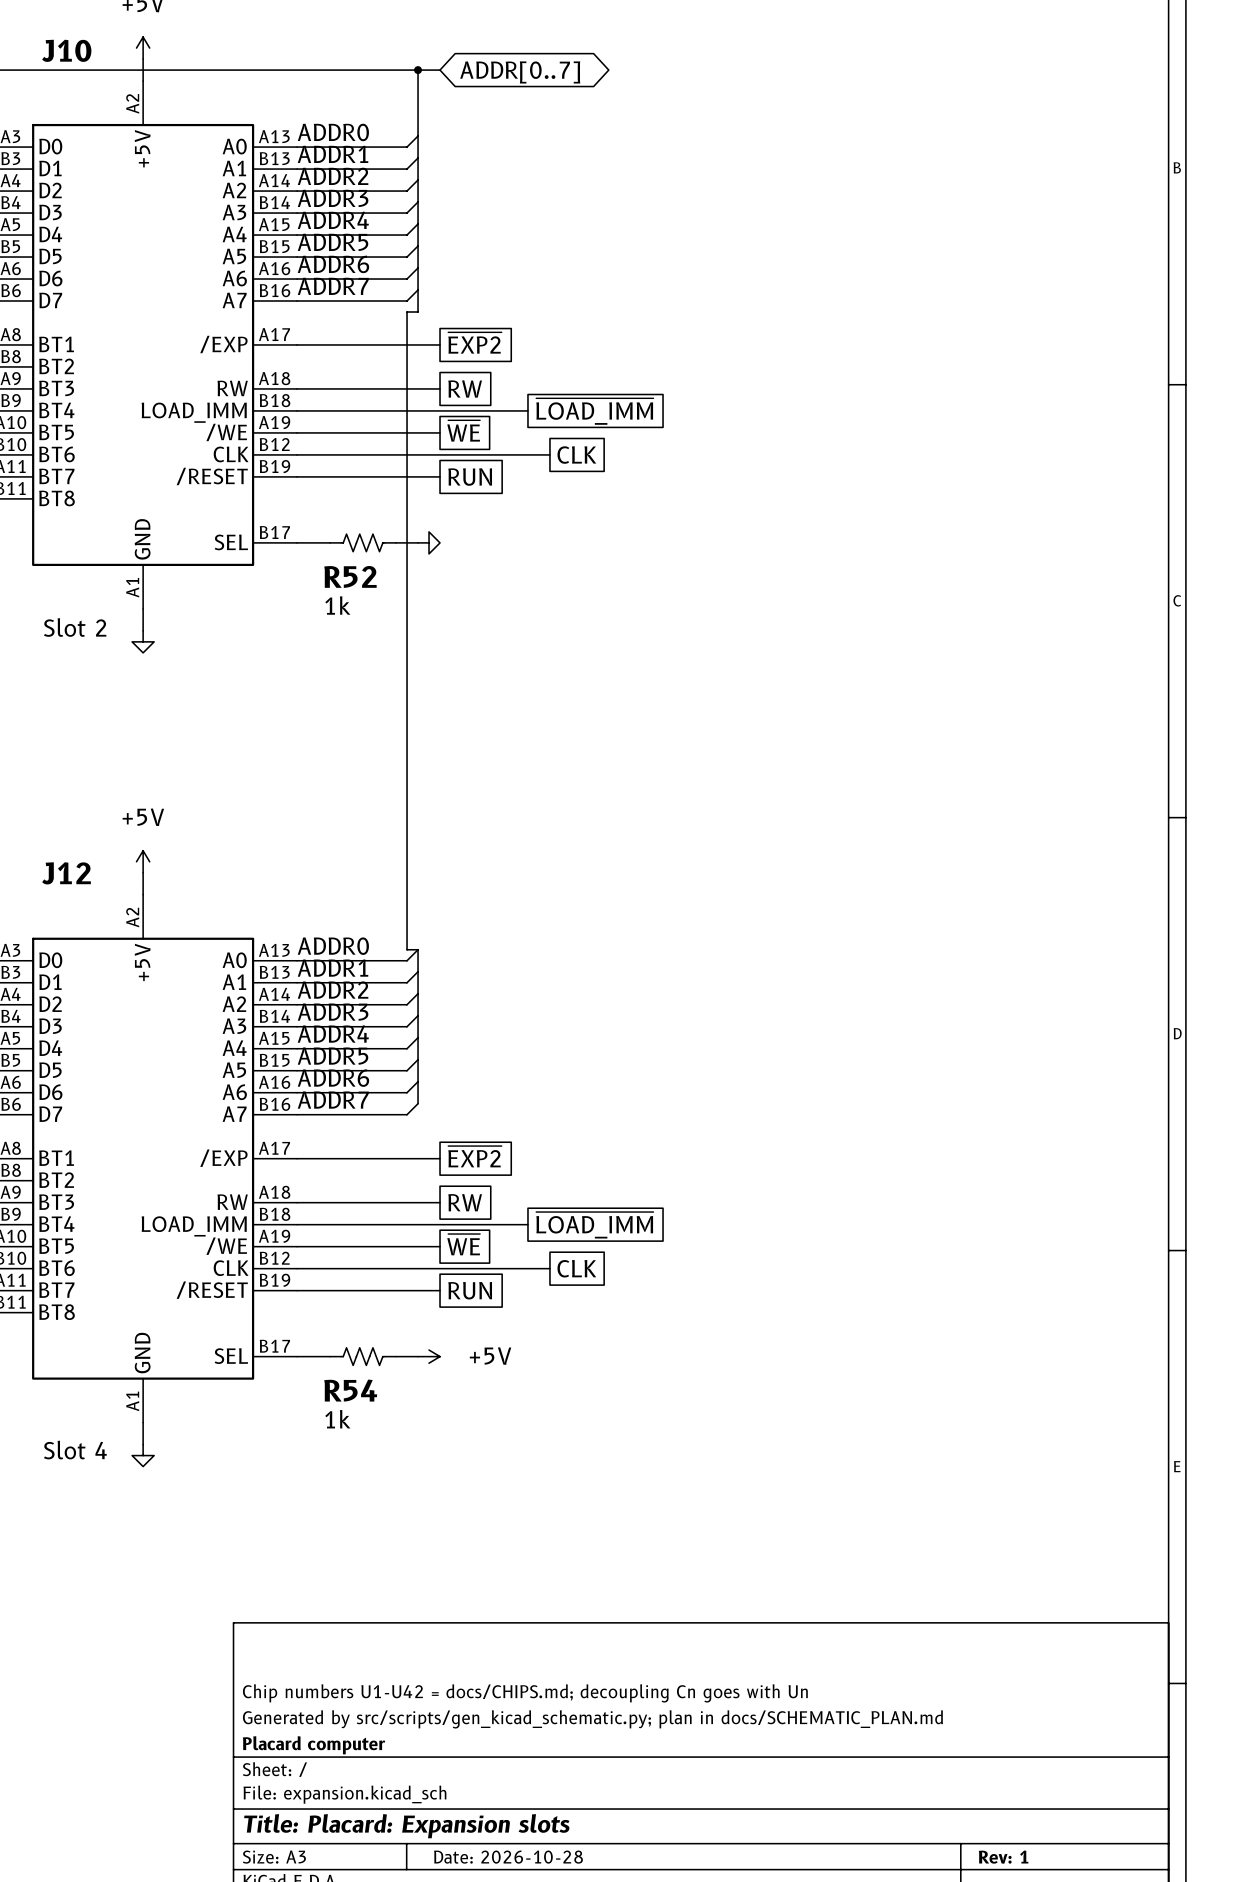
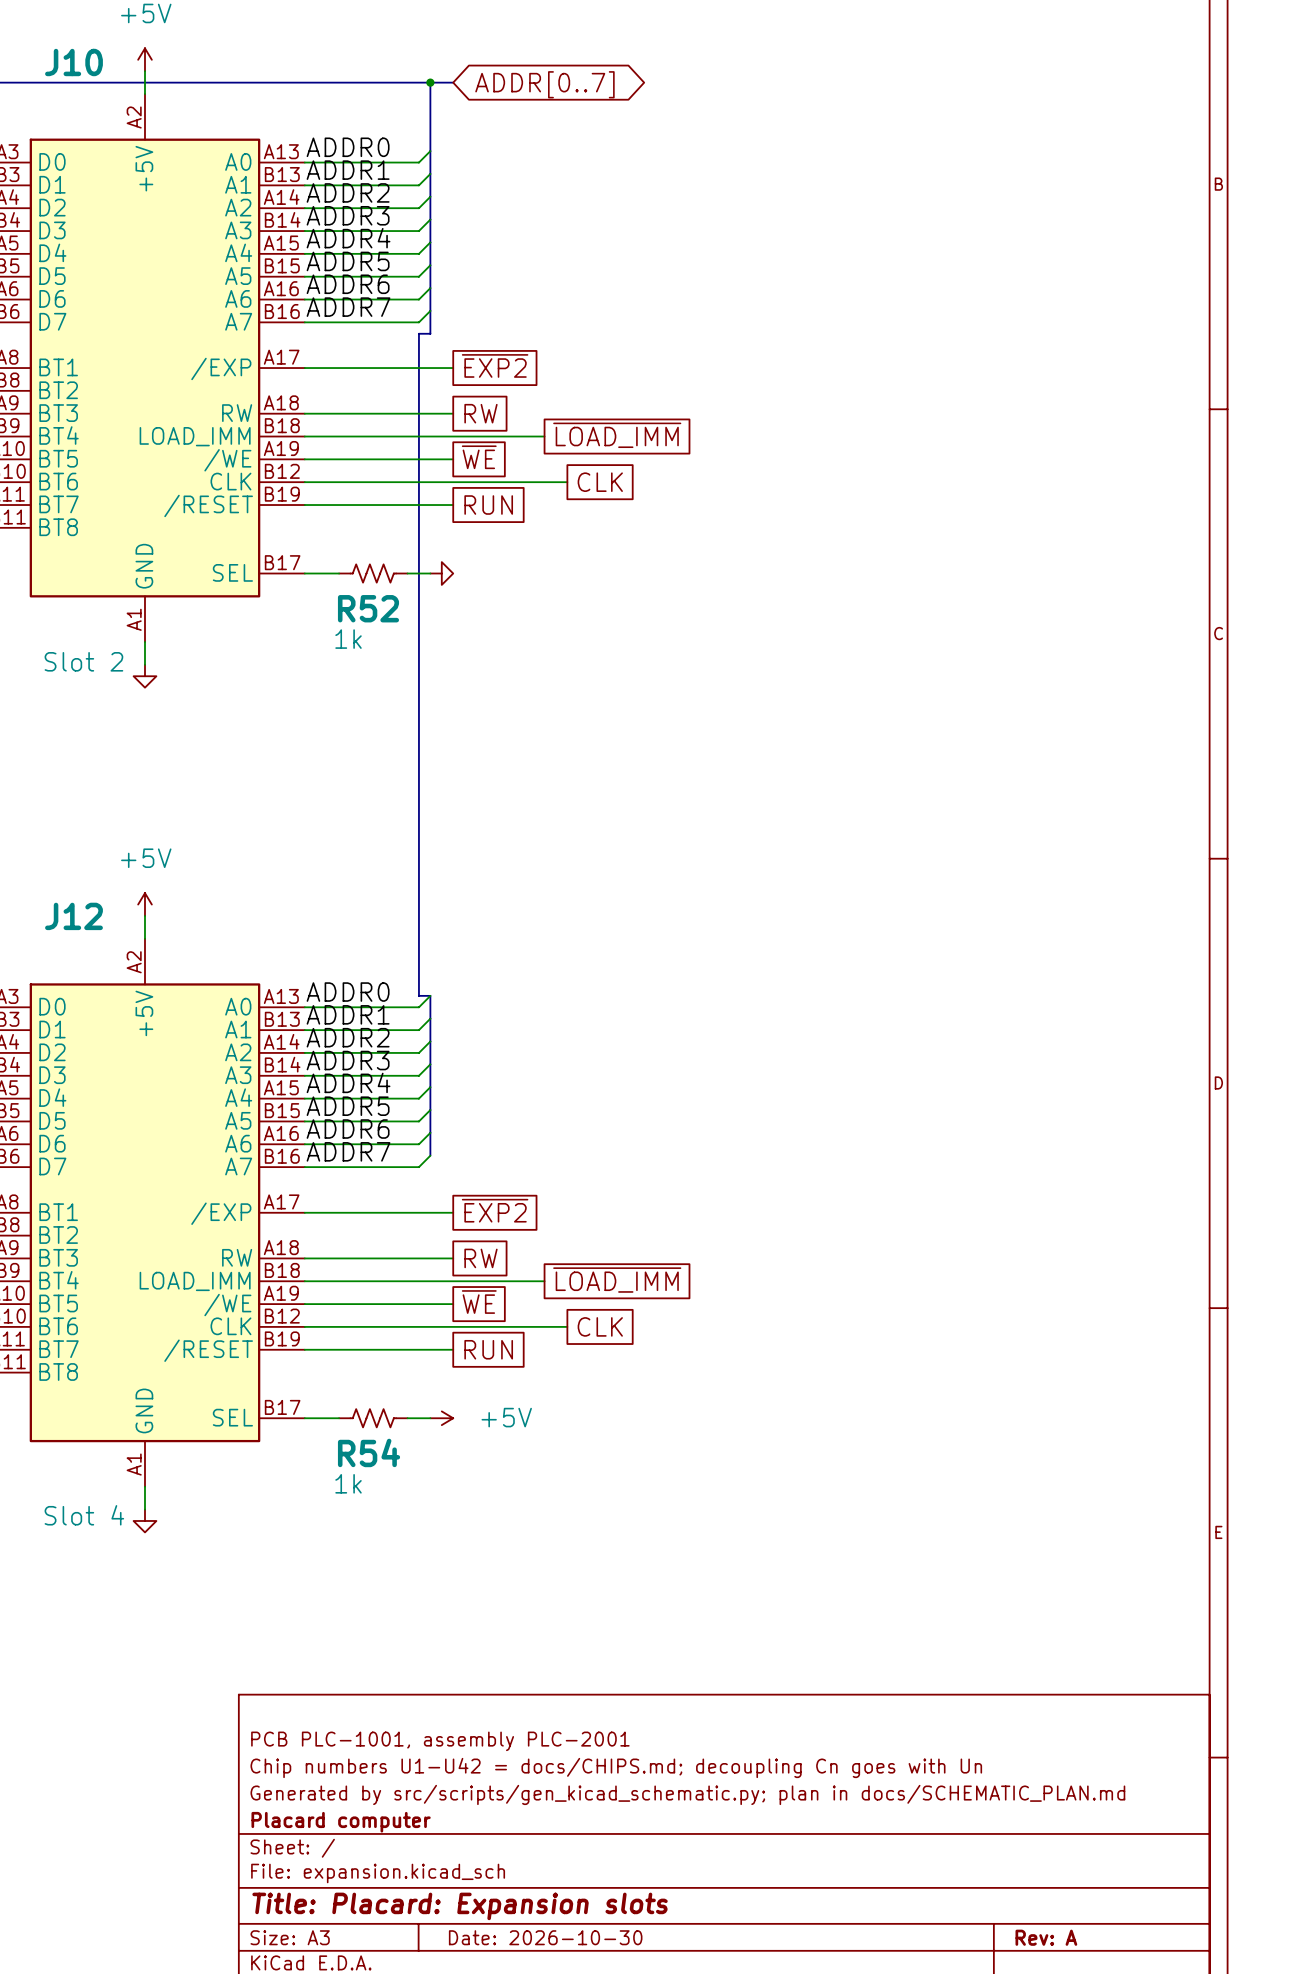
title block: none -> PCB PLC-1001, assembly PLC-2001 (440, 1741)
title block: Date: 2026-10-28 (508, 1857) -> Date: 2026-10-30 (545, 1937)
title block: Rev: 1 (1003, 1857) -> Rev: A (1046, 1937)

